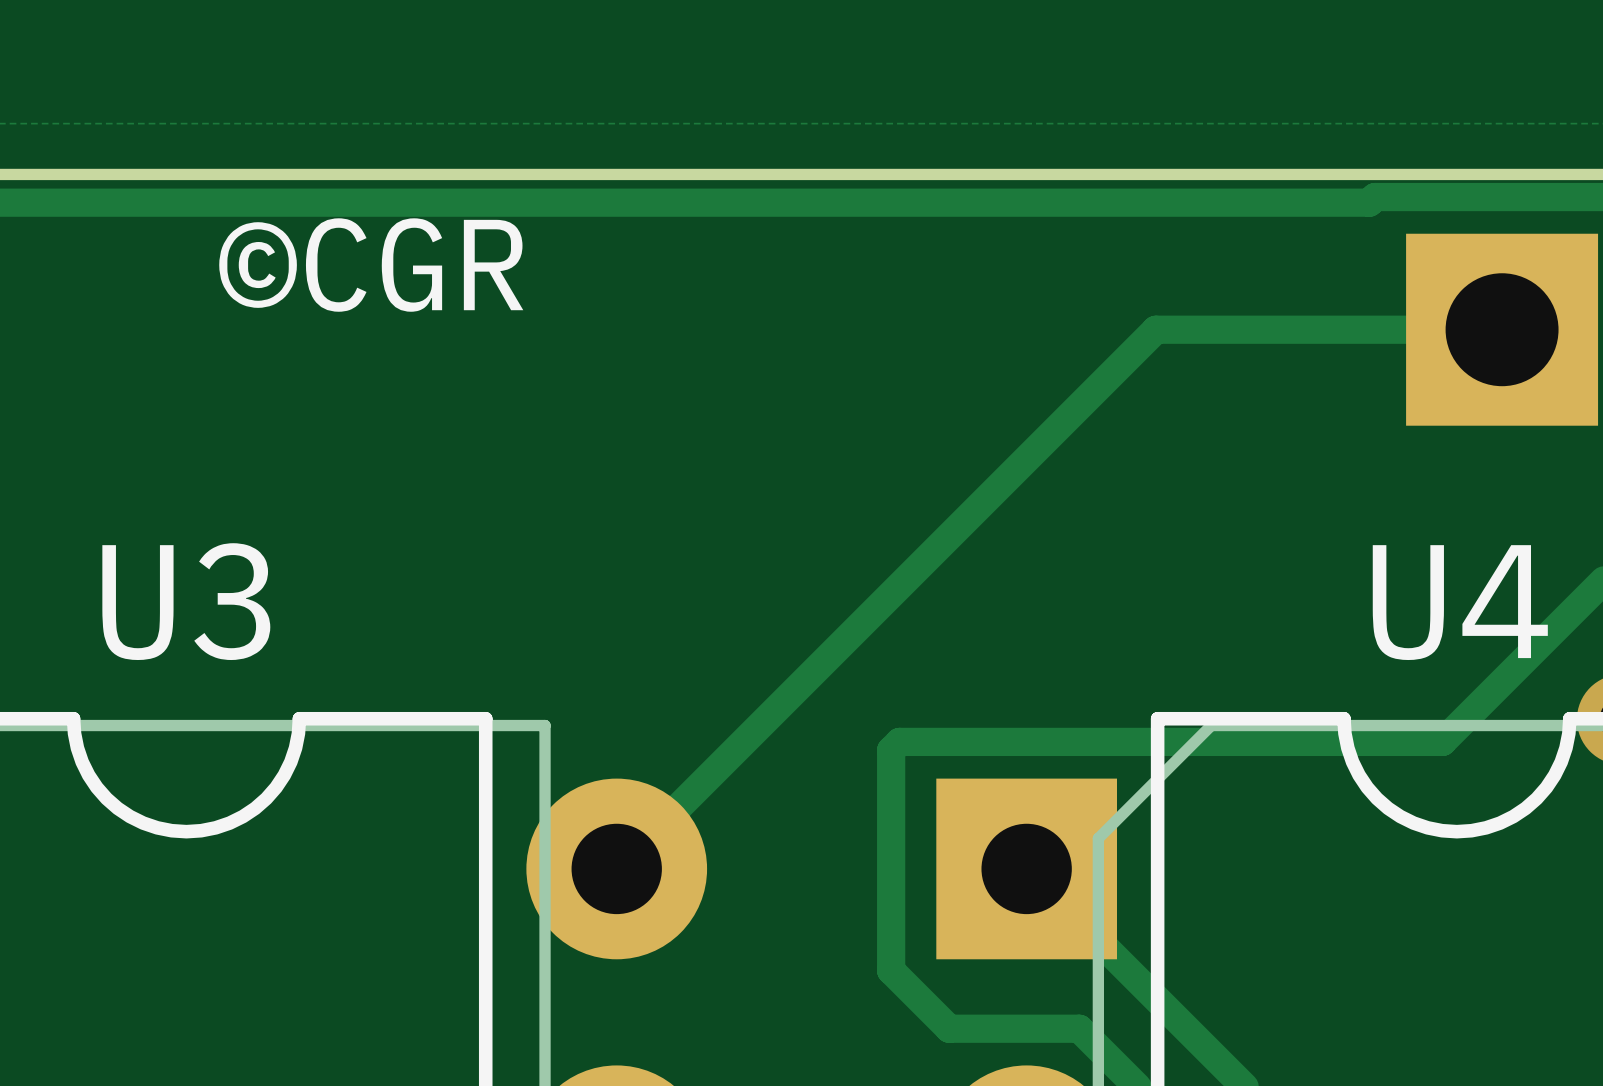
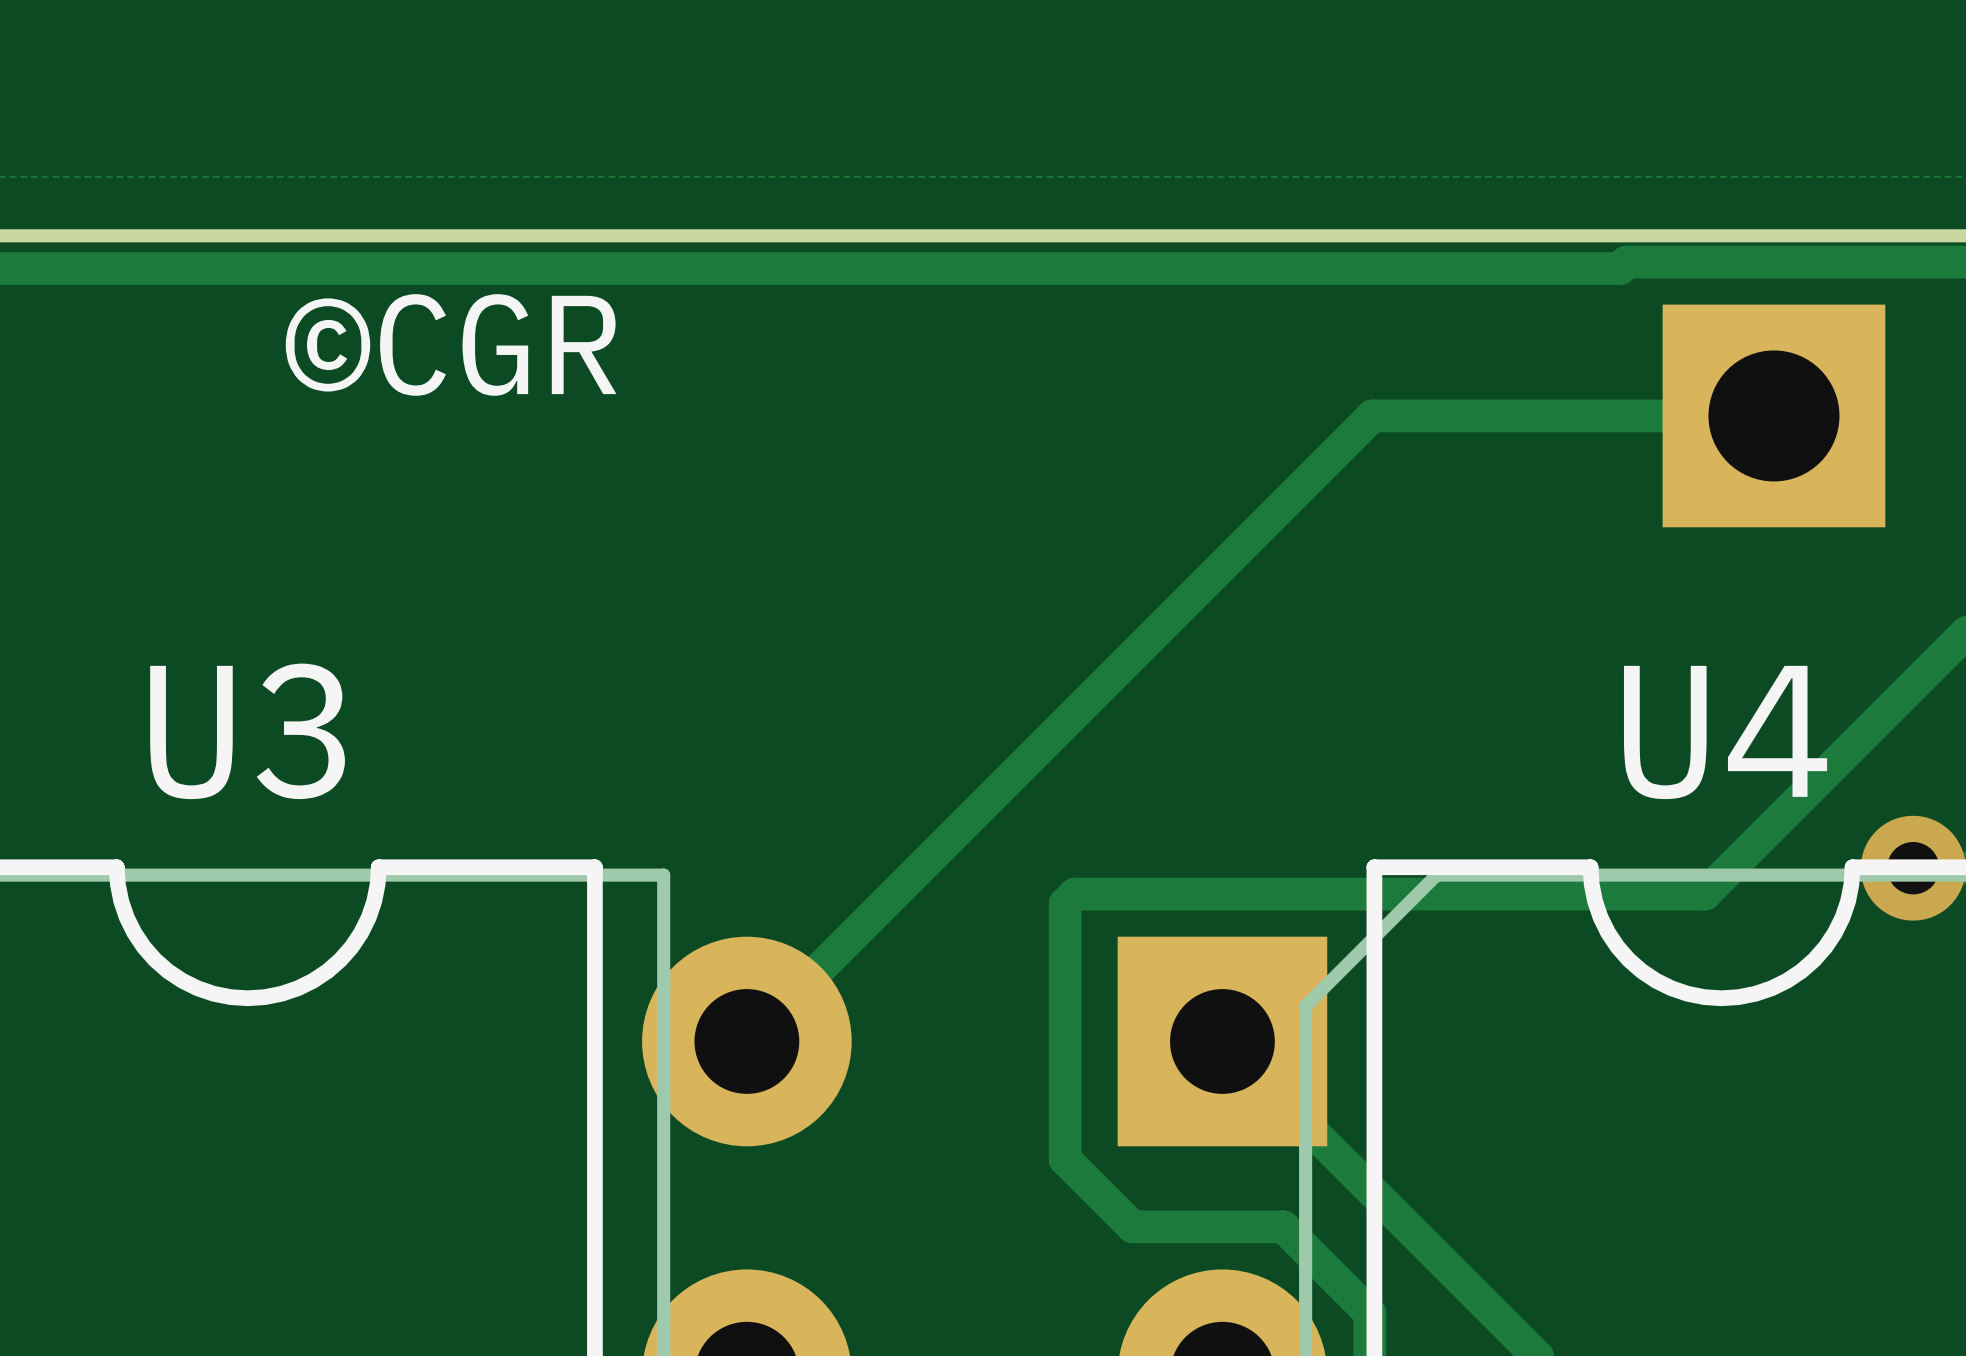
text position: ©CGR (371, 265) -> ©CGR (451, 344)

